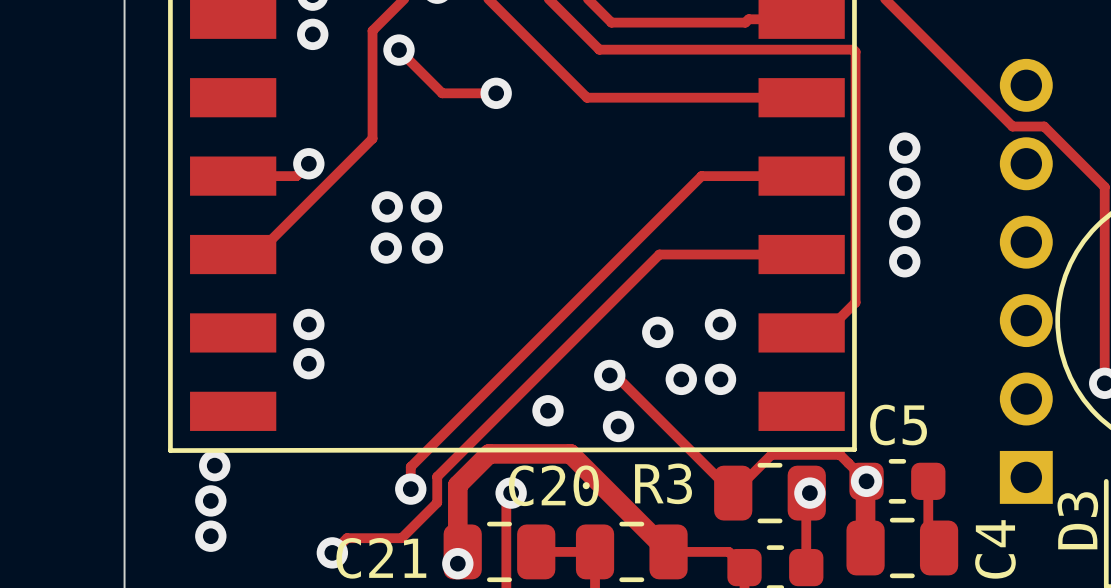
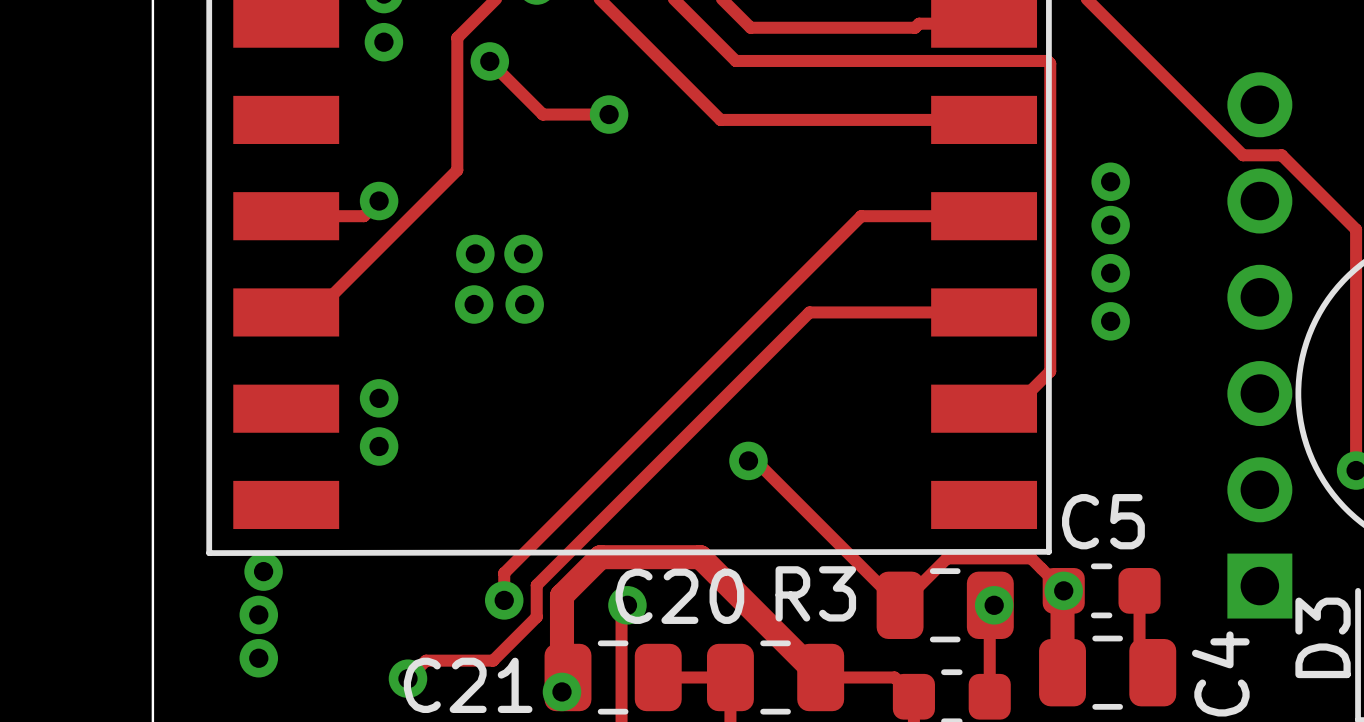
via: (720, 324) -> none
via: (657, 332) -> none
via: (681, 379) -> none
via: (720, 379) -> none
via: (547, 410) -> none
via: (618, 426) -> none

